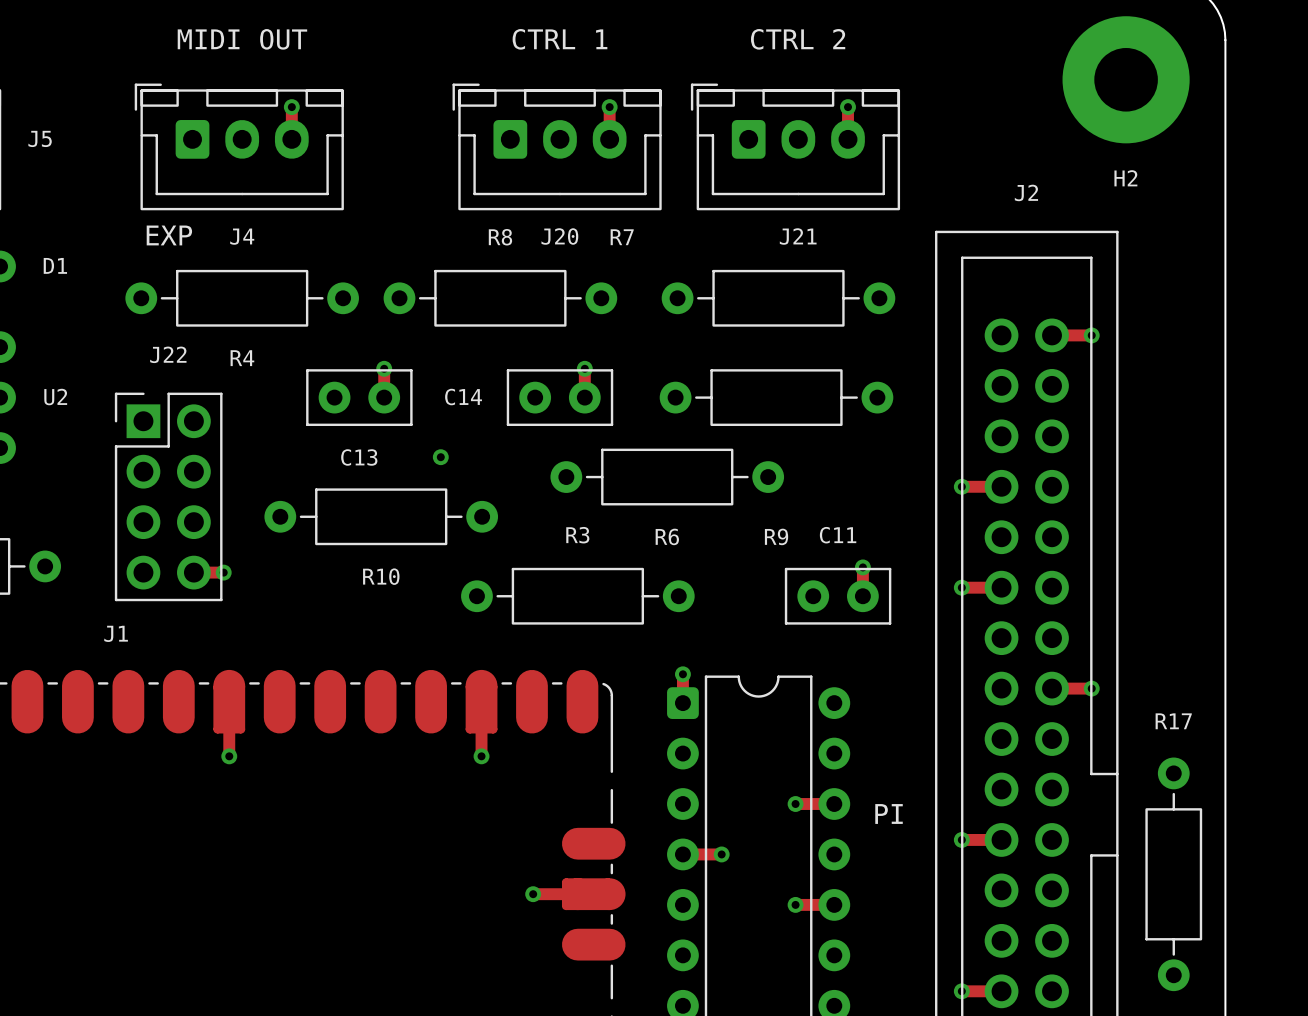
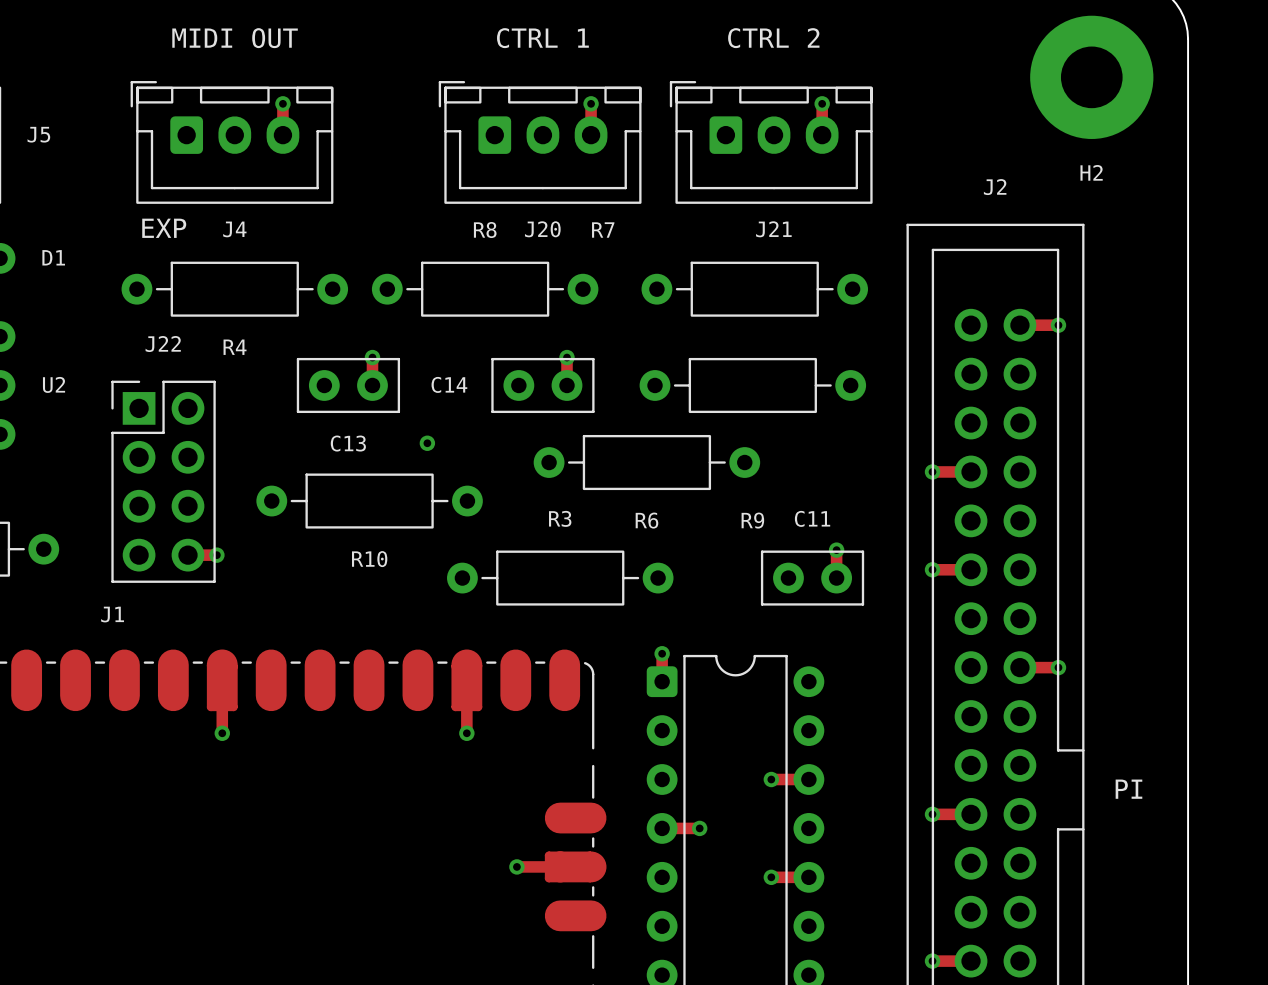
text position: PI (889, 813) -> PI (1128, 789)
R17: (1173, 874) -> none

